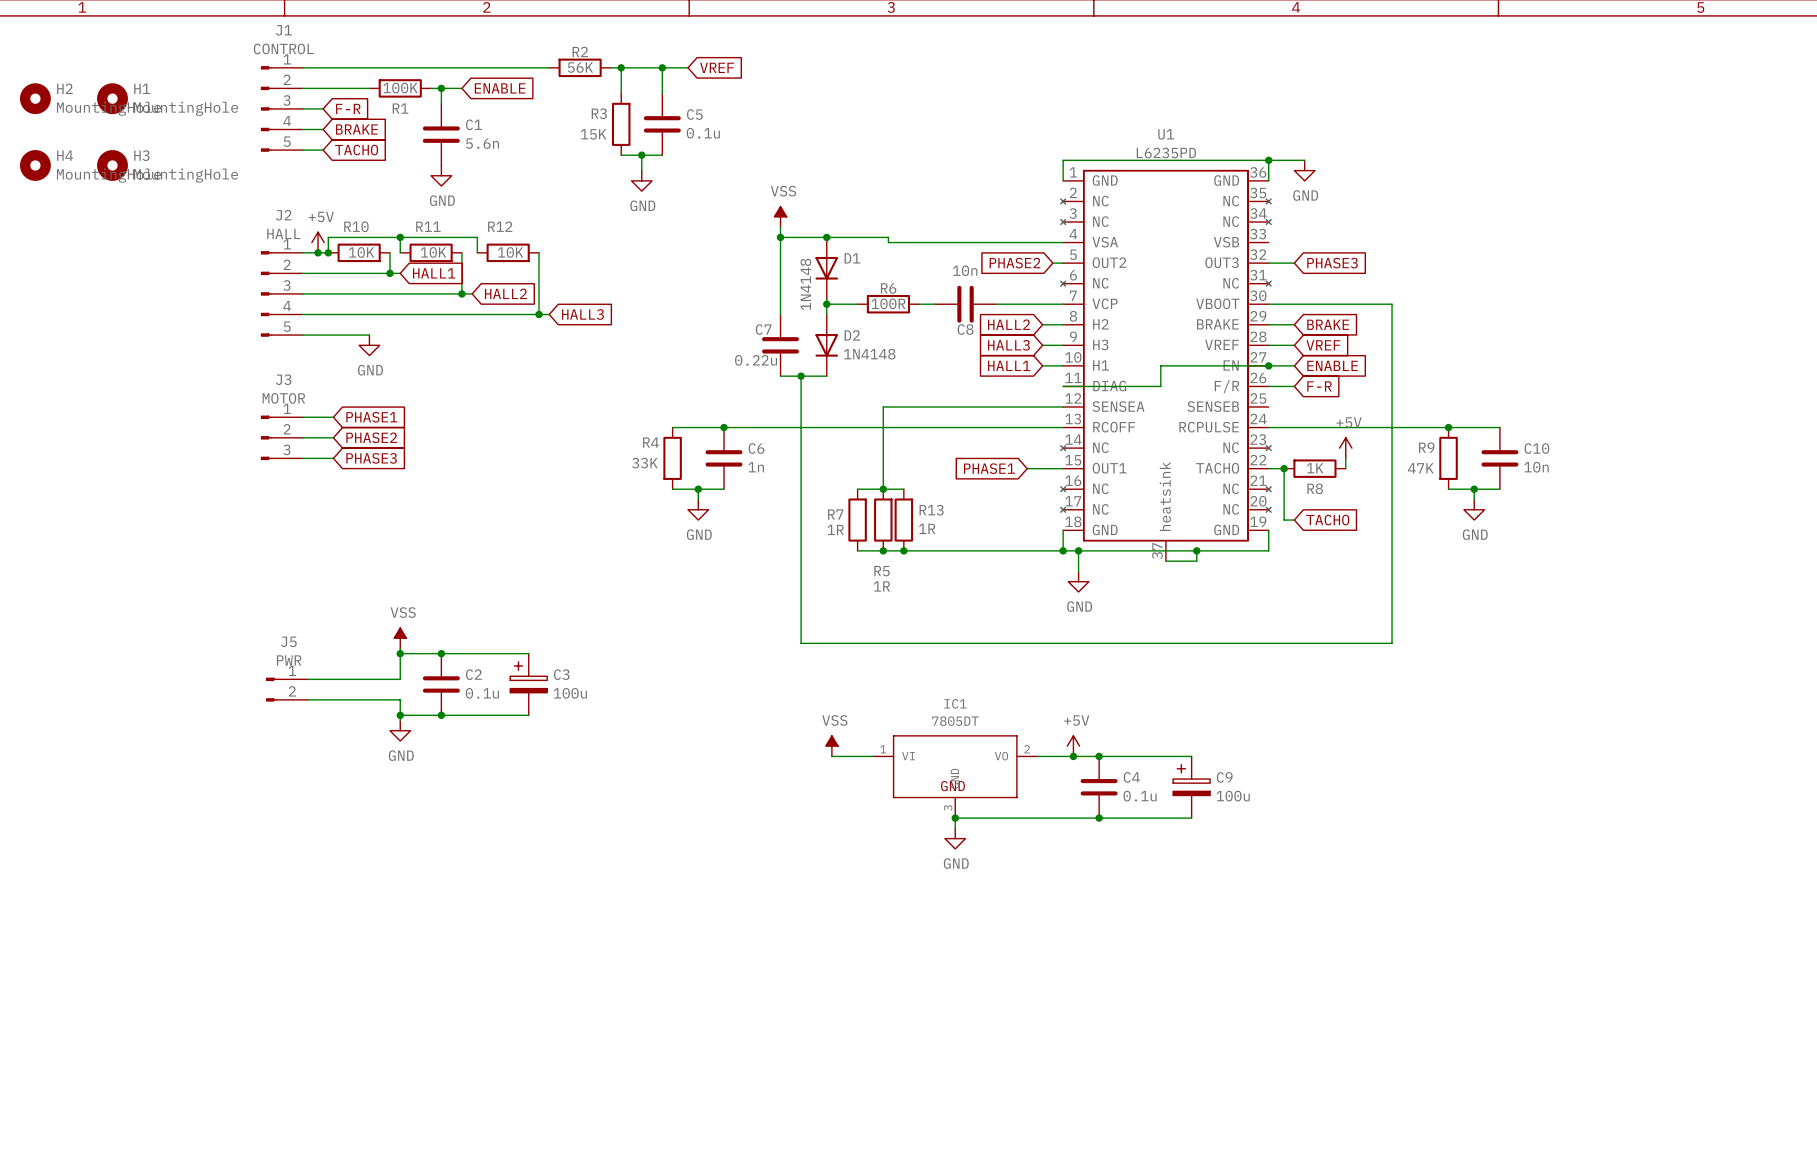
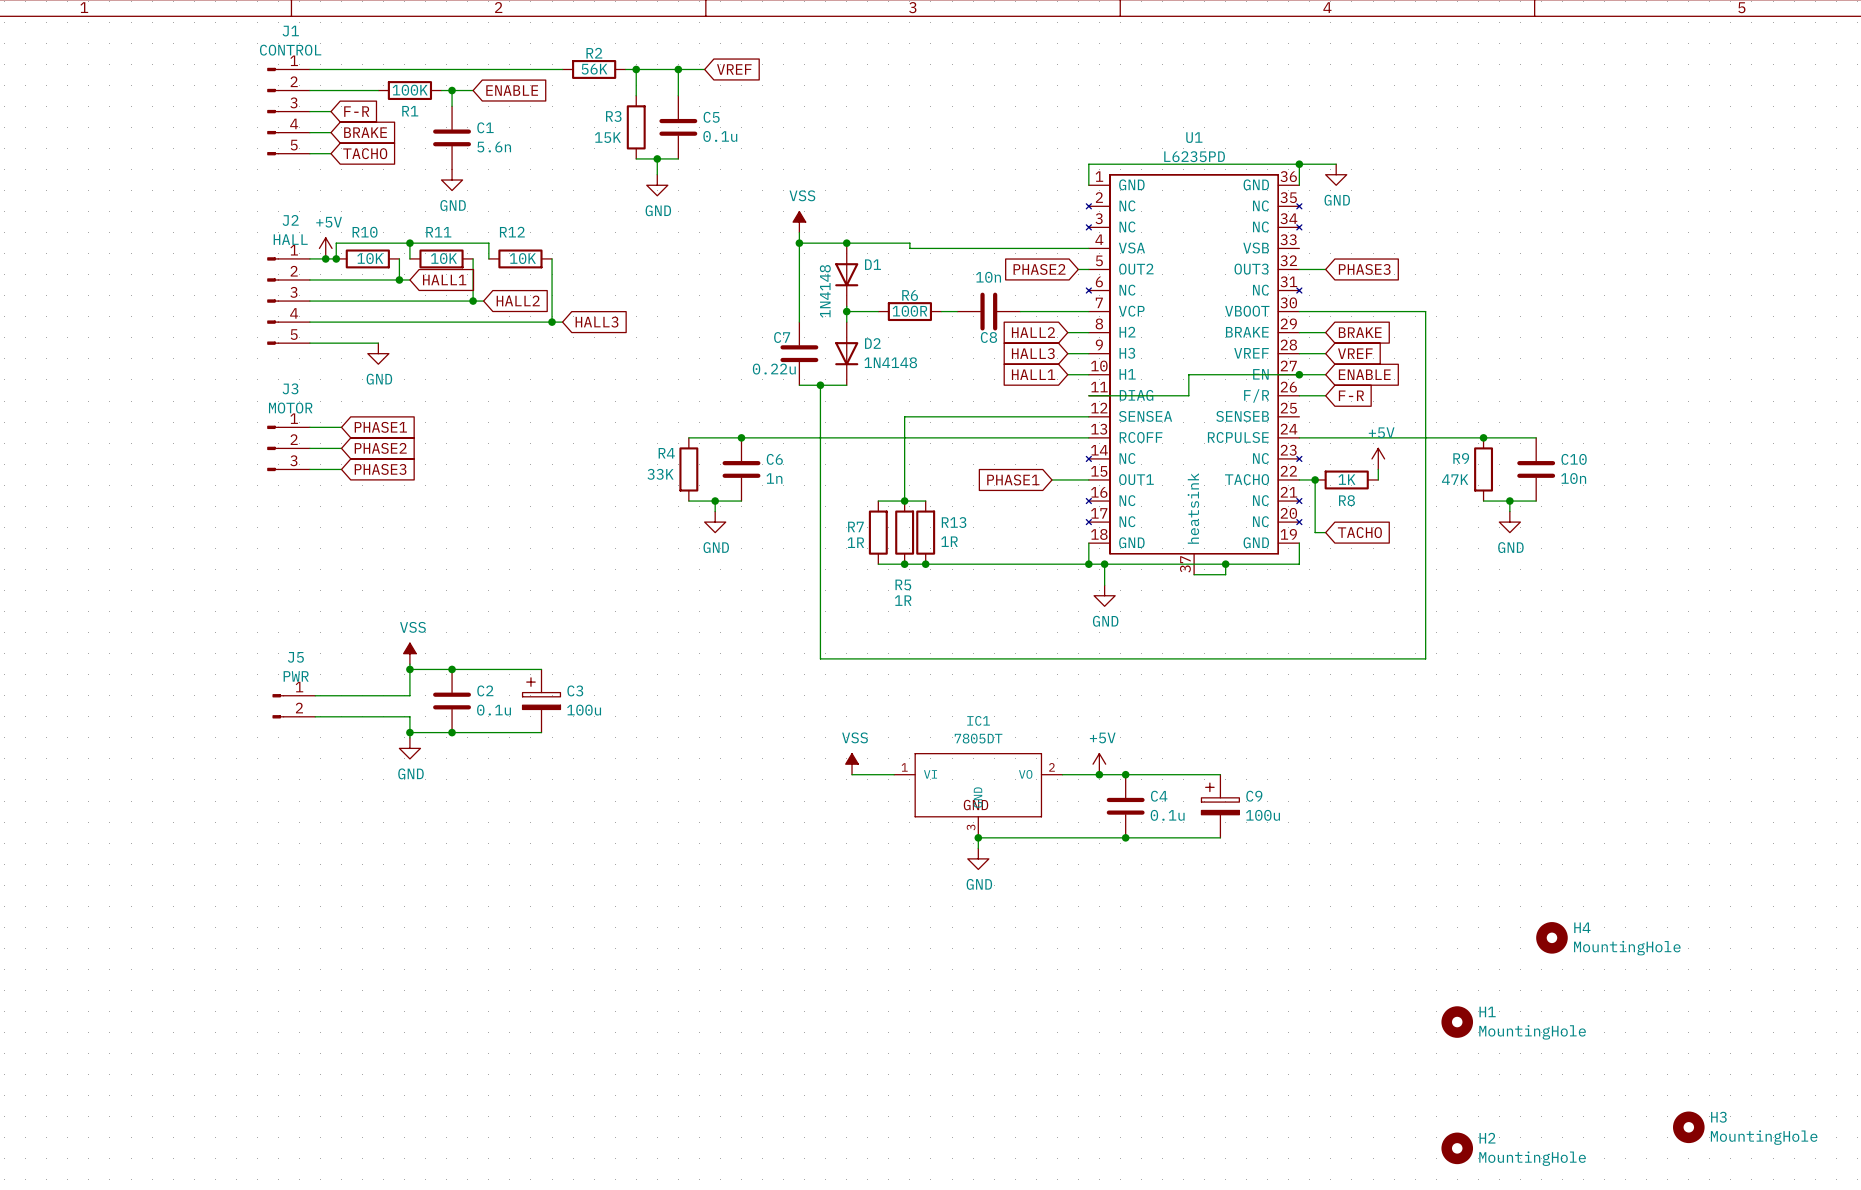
H2 position: (35, 98) -> (1457, 1148)
H1 position: (112, 98) -> (1457, 1022)
H4 position: (35, 165) -> (1551, 937)
H3 position: (112, 165) -> (1688, 1127)

